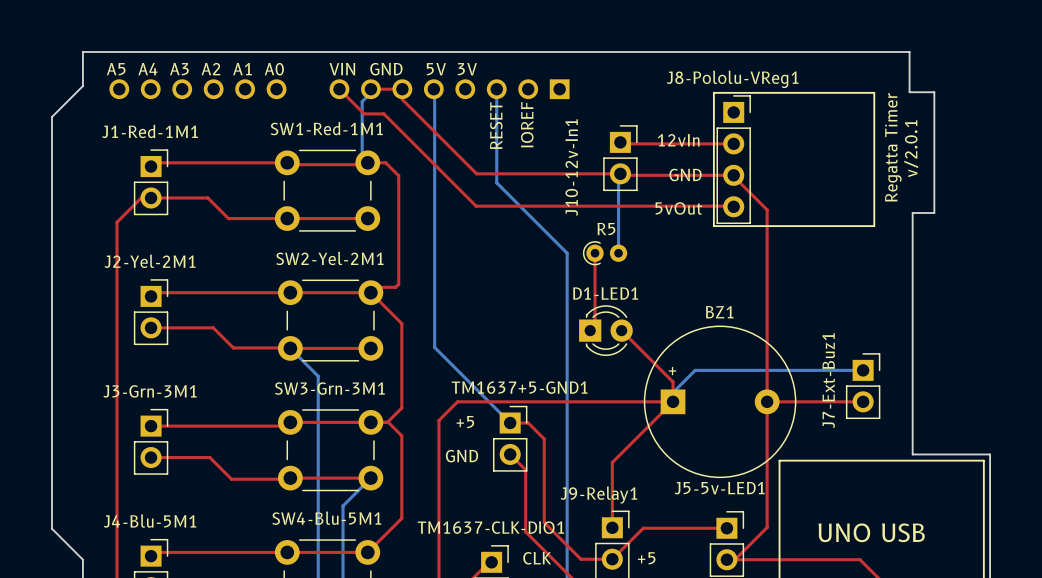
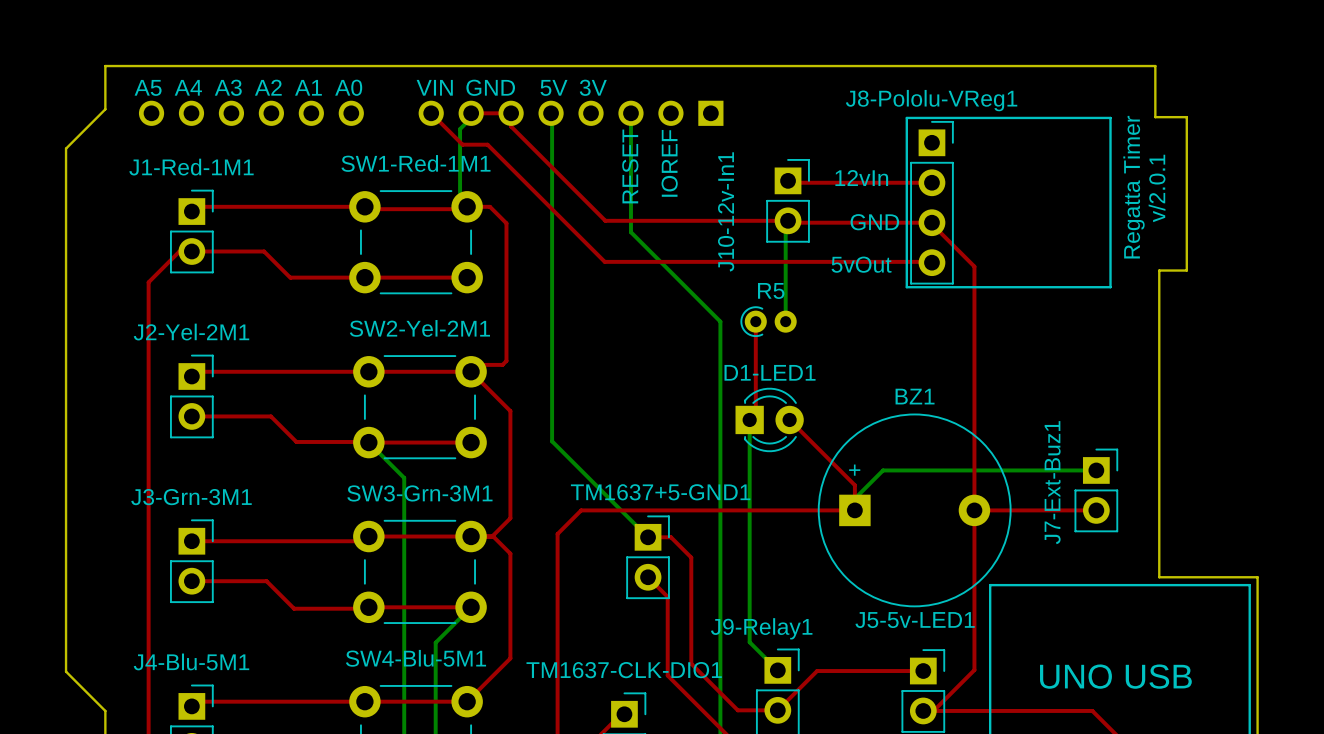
bottom track: none -> (749, 419) (749, 642) (777, 670)
top track: (673, 401) (612, 462) (612, 527) -> none
text: +5 (465, 422) -> none
text: GND (461, 456) -> none
text: CLK (537, 558) -> none
text: +5 (646, 558) -> none

